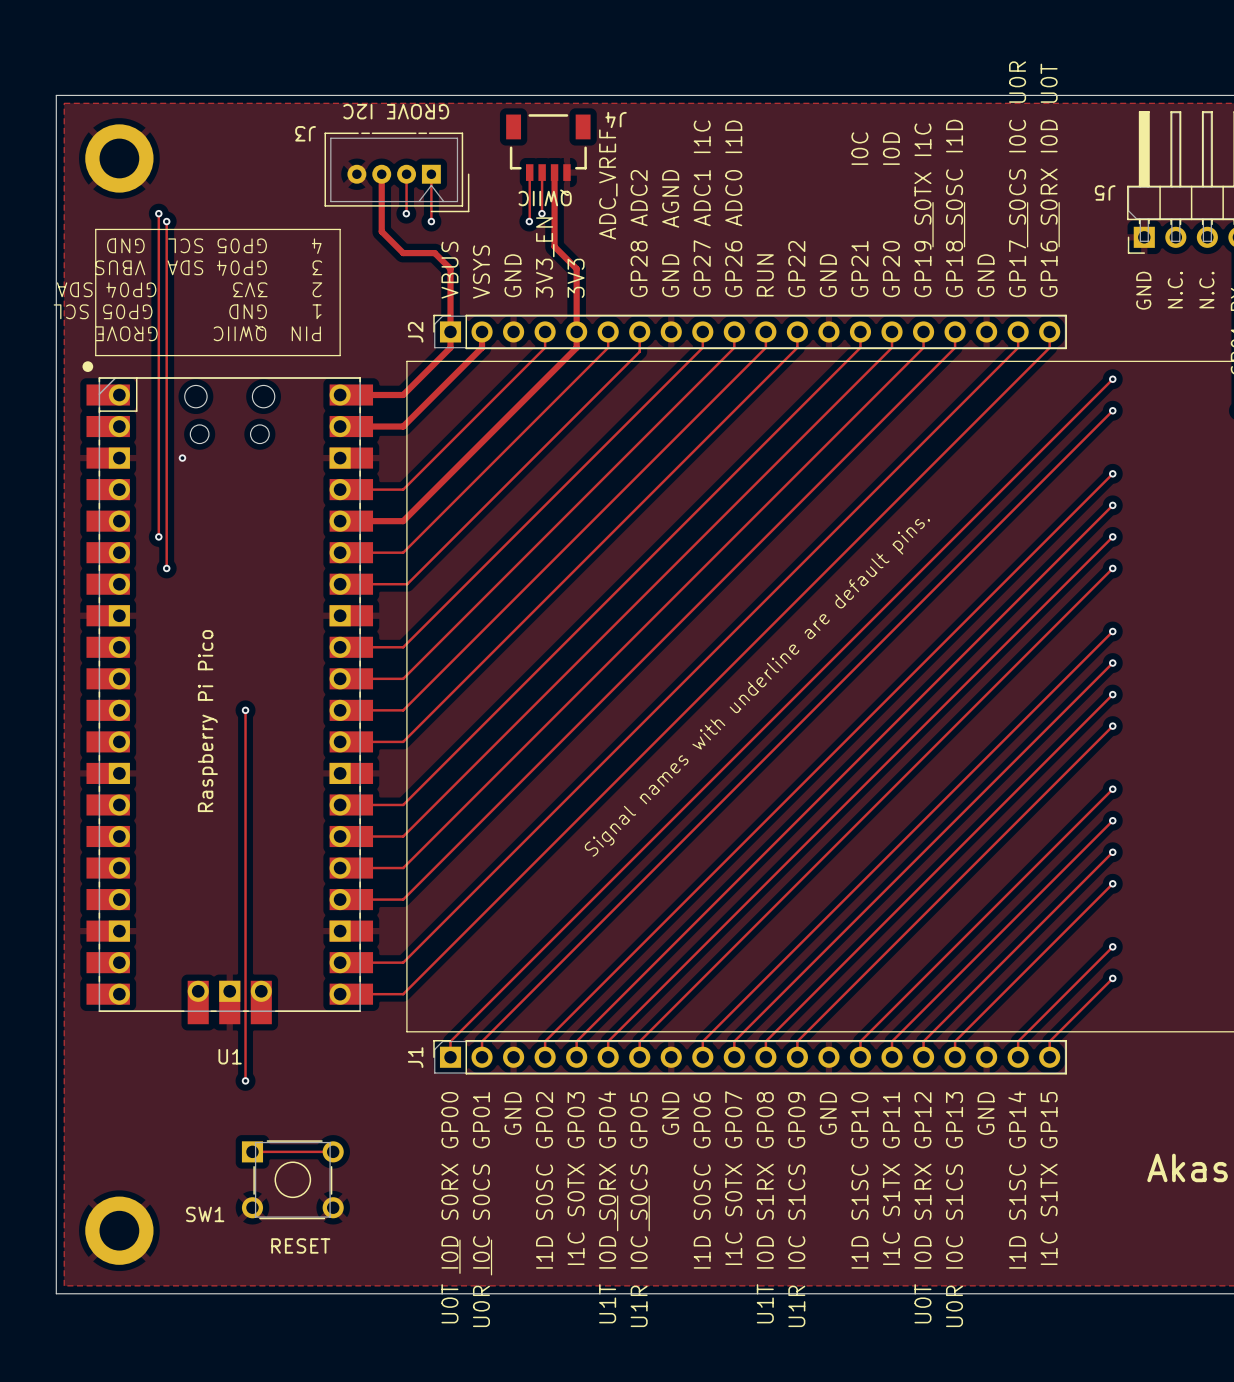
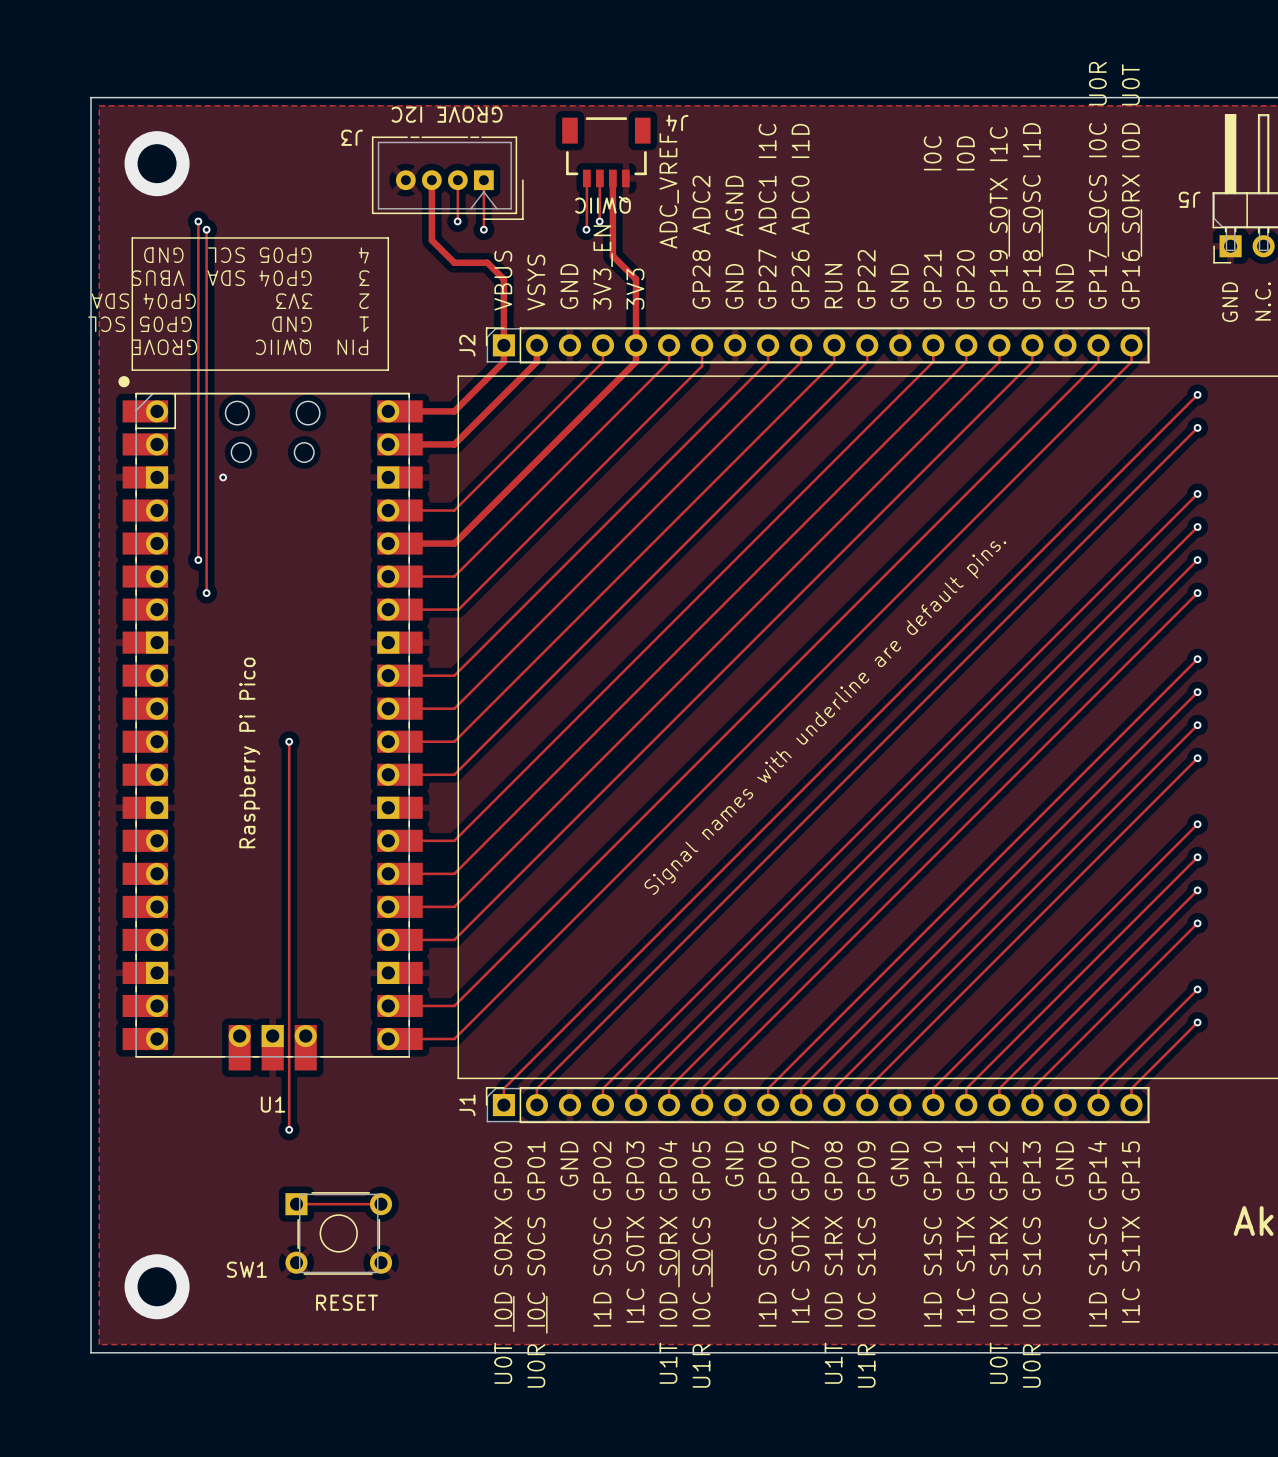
part: (119, 158) -> none
via: none -> (157, 163)
part: (119, 1230) -> none
via: none -> (157, 1286)

